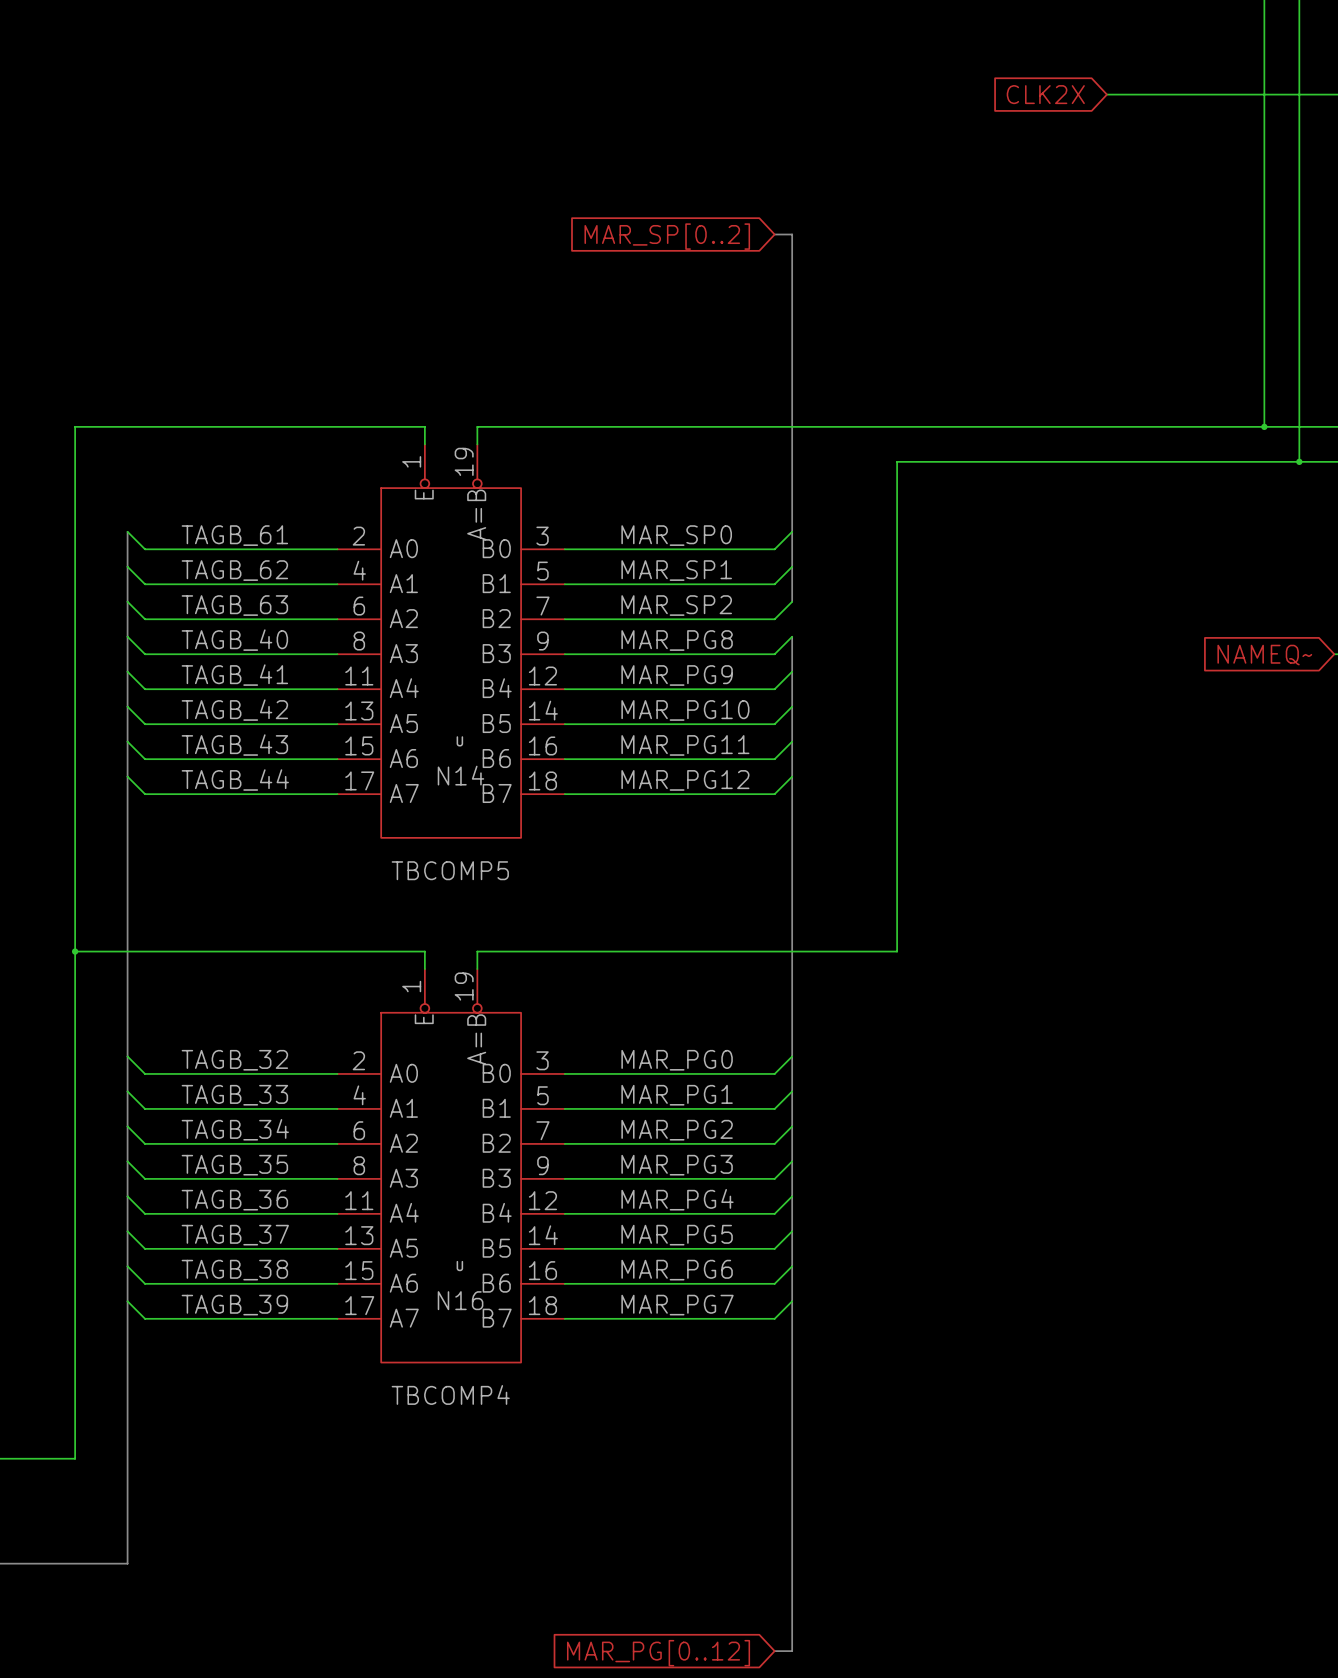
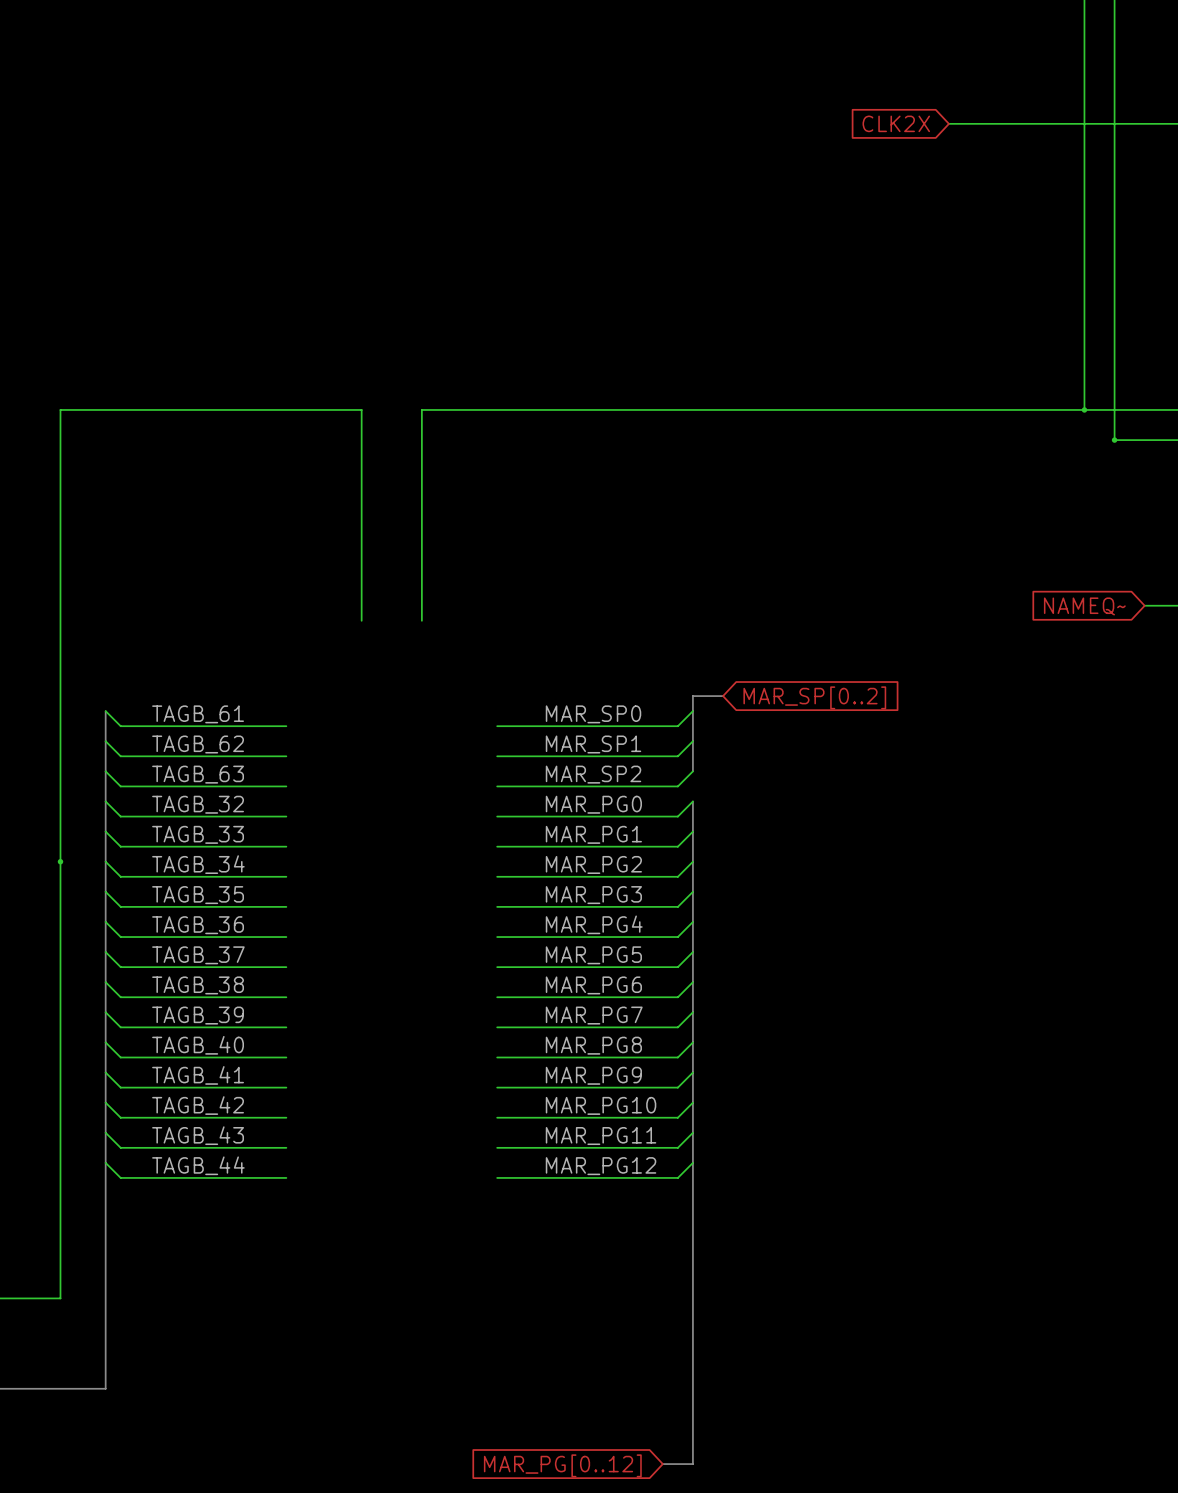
bus: (774, 234) (792, 234) (792, 601) -> none
global label: MAR_SP[0..2] (667, 236) -> none
wire: (494, 426) (477, 426) (477, 444) -> (421, 409) (421, 620)
wire: none -> (361, 425) (361, 620)
wire: (1299, 461) (897, 461) (897, 951) (477, 951) (477, 969) -> none
wire: (127, 531) (145, 549) (337, 549) -> none
bus: (127, 531) (127, 776) -> none
wire: (792, 531) (774, 549) (564, 549) -> none
label: TAGB_61 (234, 535) -> none
label: MAR_SP0 (676, 535) -> none
wire: (127, 566) (145, 584) (337, 584) -> none
wire: (792, 566) (774, 584) (564, 584) -> none
label: TAGB_62 (234, 570) -> none
label: MAR_SP1 (676, 570) -> none
wire: (127, 601) (145, 619) (337, 619) -> none
wire: (792, 601) (774, 619) (564, 619) -> none
label: TAGB_63 (234, 605) -> none
label: MAR_SP2 (676, 605) -> none
wire: (127, 636) (145, 654) (337, 654) -> none
wire: (792, 636) (774, 654) (564, 654) -> none
bus: (792, 636) (792, 1651) -> (692, 801) (692, 1464) (677, 1464)
label: TAGB_40 (234, 640) -> none
label: MAR_PG8 (677, 640) -> none
U: (451, 641) -> none
wire: (127, 671) (145, 689) (337, 689) -> (105, 741) (120, 756) (286, 756)
wire: (792, 671) (774, 689) (564, 689) -> (692, 741) (677, 756) (497, 756)
label: TAGB_41 (234, 675) -> none
label: MAR_PG9 (677, 675) -> none
wire: (127, 706) (145, 724) (337, 724) -> (105, 771) (120, 786) (286, 786)
wire: (792, 706) (774, 724) (564, 724) -> (692, 771) (677, 786) (497, 786)
label: TAGB_42 (234, 710) -> none
label: MAR_PG10 (685, 710) -> none
wire: (127, 741) (145, 759) (337, 759) -> (105, 801) (120, 816) (286, 816)
wire: (792, 741) (774, 759) (564, 759) -> (692, 801) (677, 816) (497, 816)
label: TAGB_43 (234, 745) -> none
label: MAR_PG11 (685, 745) -> none
bus: none -> (723, 696) (692, 696) (692, 771)
global label: none -> MAR_SP[0..2] (814, 697)
wire: (792, 776) (774, 794) -> (692, 711) (677, 726) (662, 726)
label: TAGB_44 (235, 780) -> TAGB_61 (198, 714)
label: MAR_PG12 (685, 780) -> MAR_SP0 (593, 714)
wire: (564, 794) (582, 794) -> none
label: none -> TAGB_62 (198, 744)
label: none -> MAR_SP1 (593, 744)
label: none -> TAGB_63 (198, 774)
label: none -> MAR_SP2 (593, 774)
label: none -> TAGB_32 (198, 804)
label: none -> MAR_PG0 (593, 804)
wire: none -> (105, 831) (120, 846) (286, 846)
wire: none -> (692, 831) (677, 846) (497, 846)
label: none -> TAGB_33 (198, 834)
label: none -> MAR_PG1 (593, 834)
wire: (75, 951) (424, 951) (424, 969) -> none
wire: none -> (105, 861) (120, 876) (286, 876)
wire: none -> (692, 861) (677, 876) (497, 876)
label: none -> TAGB_34 (198, 864)
label: none -> MAR_PG2 (593, 864)
wire: none -> (105, 891) (120, 906) (286, 906)
wire: none -> (692, 891) (677, 906) (497, 906)
label: none -> TAGB_35 (198, 895)
label: none -> MAR_PG3 (593, 895)
wire: none -> (105, 921) (120, 937) (286, 937)
wire: none -> (692, 921) (677, 937) (497, 937)
label: none -> MAR_PG4 (594, 924)
label: none -> TAGB_36 (198, 925)
wire: (792, 1056) (774, 1073) -> (692, 952) (677, 967) (662, 967)
label: TAGB_32 (234, 1060) -> TAGB_37 (198, 955)
label: MAR_PG0 (677, 1060) -> MAR_PG5 (593, 955)
wire: (564, 1073) (582, 1073) -> none
wire: (792, 1091) (774, 1108) -> (692, 982) (677, 997) (662, 997)
label: TAGB_33 (234, 1095) -> TAGB_38 (198, 985)
label: MAR_PG1 (677, 1095) -> MAR_PG6 (593, 985)
wire: (564, 1108) (582, 1108) -> none
wire: (792, 1126) (774, 1143) -> (692, 1012) (677, 1027) (662, 1027)
label: TAGB_34 (235, 1129) -> TAGB_39 (198, 1015)
label: MAR_PG2 (677, 1130) -> MAR_PG7 (594, 1015)
wire: (564, 1143) (582, 1143) -> none
wire: (792, 1161) (774, 1178) -> (692, 1042) (677, 1057) (662, 1057)
label: TAGB_35 (234, 1165) -> TAGB_40 (198, 1045)
U: (451, 1165) -> none
label: MAR_PG3 (677, 1165) -> MAR_PG8 (593, 1045)
wire: (564, 1178) (582, 1178) -> none
wire: (792, 1196) (774, 1213) -> (692, 1072) (677, 1087) (662, 1087)
label: MAR_PG4 (677, 1199) -> MAR_PG9 (593, 1075)
label: TAGB_36 (234, 1200) -> TAGB_41 (198, 1075)
wire: (564, 1213) (582, 1213) -> none
wire: (792, 1231) (774, 1248) -> (692, 1102) (677, 1117) (662, 1117)
label: TAGB_37 (235, 1235) -> TAGB_42 (198, 1105)
label: MAR_PG5 (677, 1235) -> MAR_PG10 (601, 1105)
wire: (564, 1248) (582, 1248) -> none
wire: (792, 1266) (774, 1283) -> (692, 1132) (677, 1147) (662, 1147)
label: TAGB_38 (234, 1270) -> TAGB_43 (198, 1135)
label: MAR_PG6 (677, 1270) -> MAR_PG11 (601, 1136)
wire: (564, 1283) (582, 1283) -> none
wire: (792, 1301) (774, 1318) -> (692, 1162) (677, 1177) (662, 1177)
label: TAGB_39 (234, 1305) -> TAGB_44 (198, 1165)
label: MAR_PG7 (677, 1305) -> MAR_PG12 (601, 1166)
wire: (564, 1318) (582, 1318) -> none

